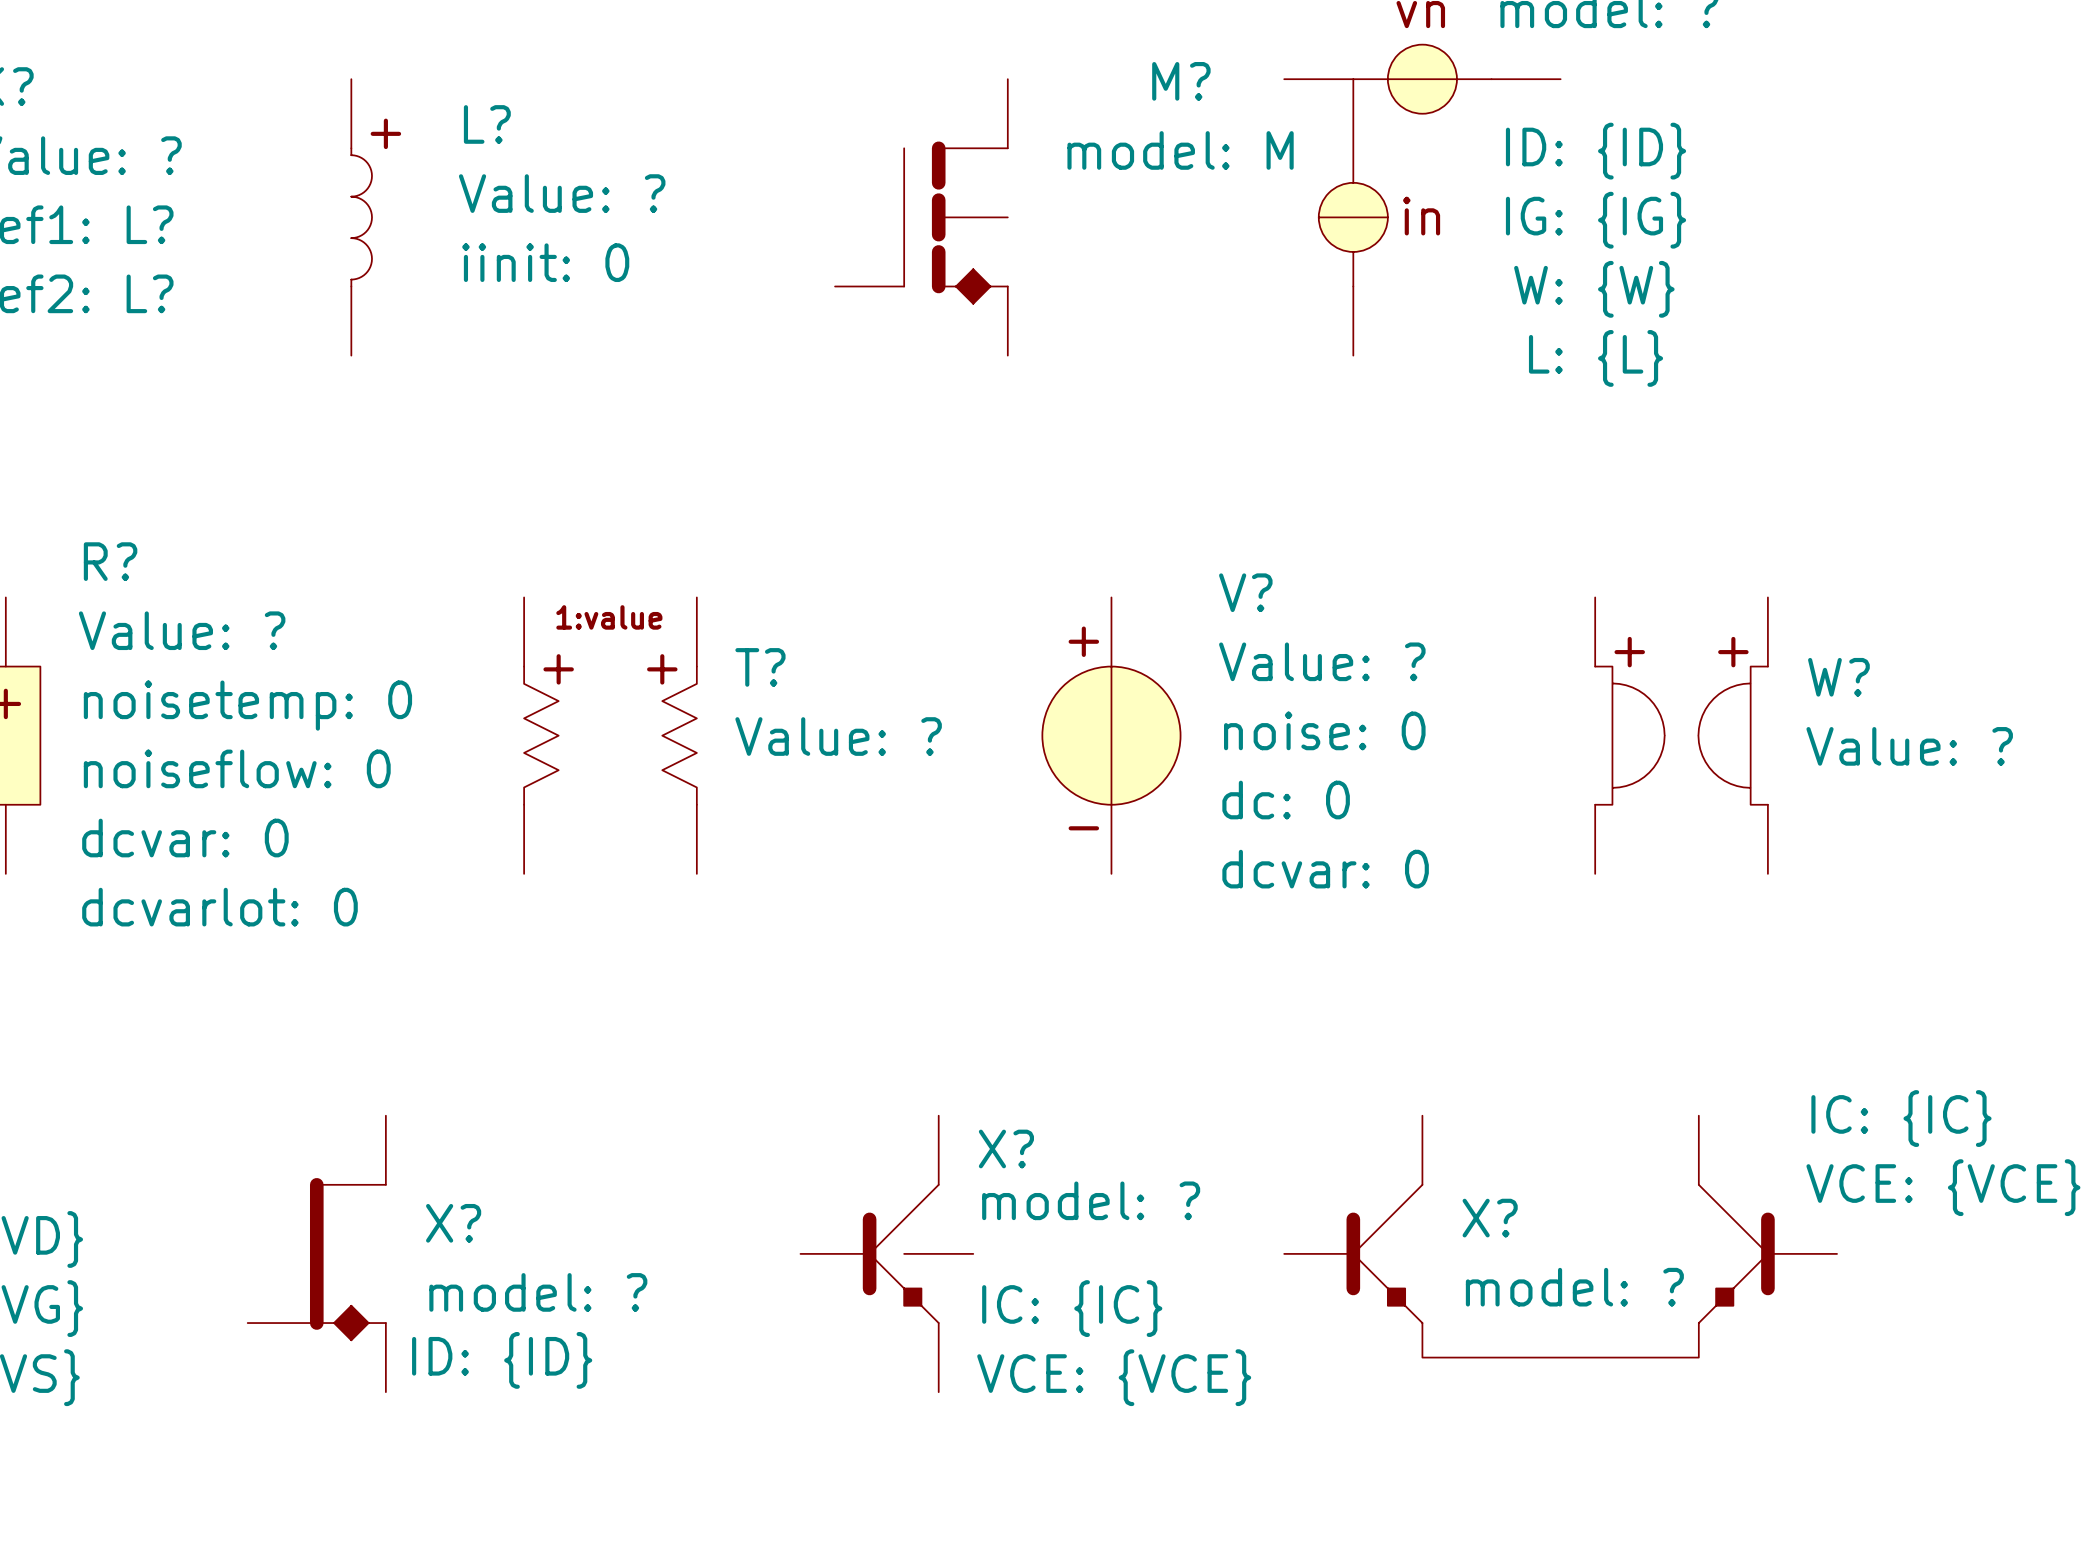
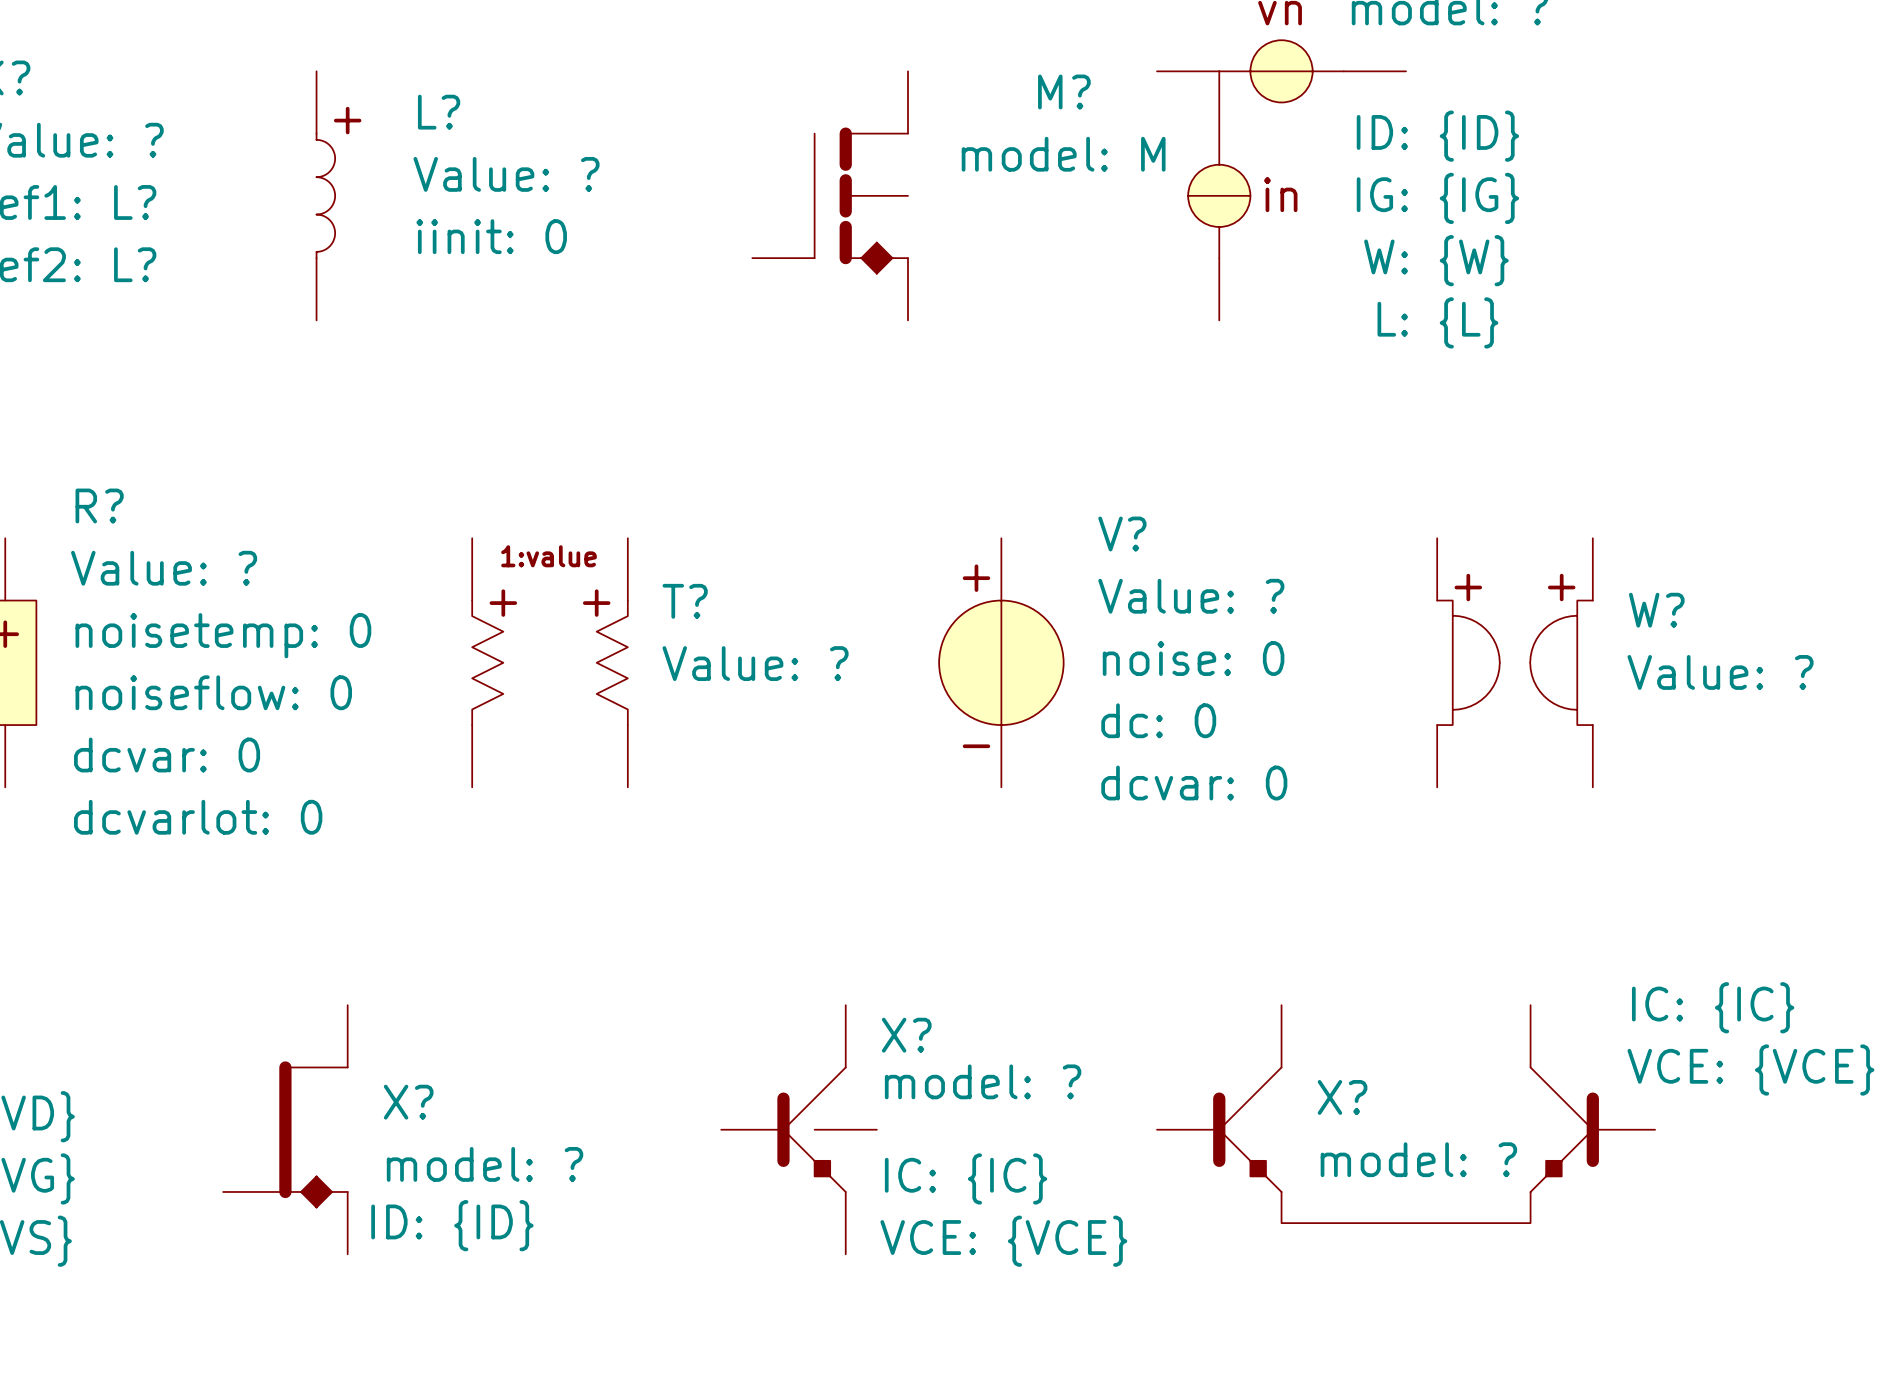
M? name position: M? (1181, 81) -> M? (1064, 91)
M? text position: model: M (1180, 150) -> model: M (1063, 154)

